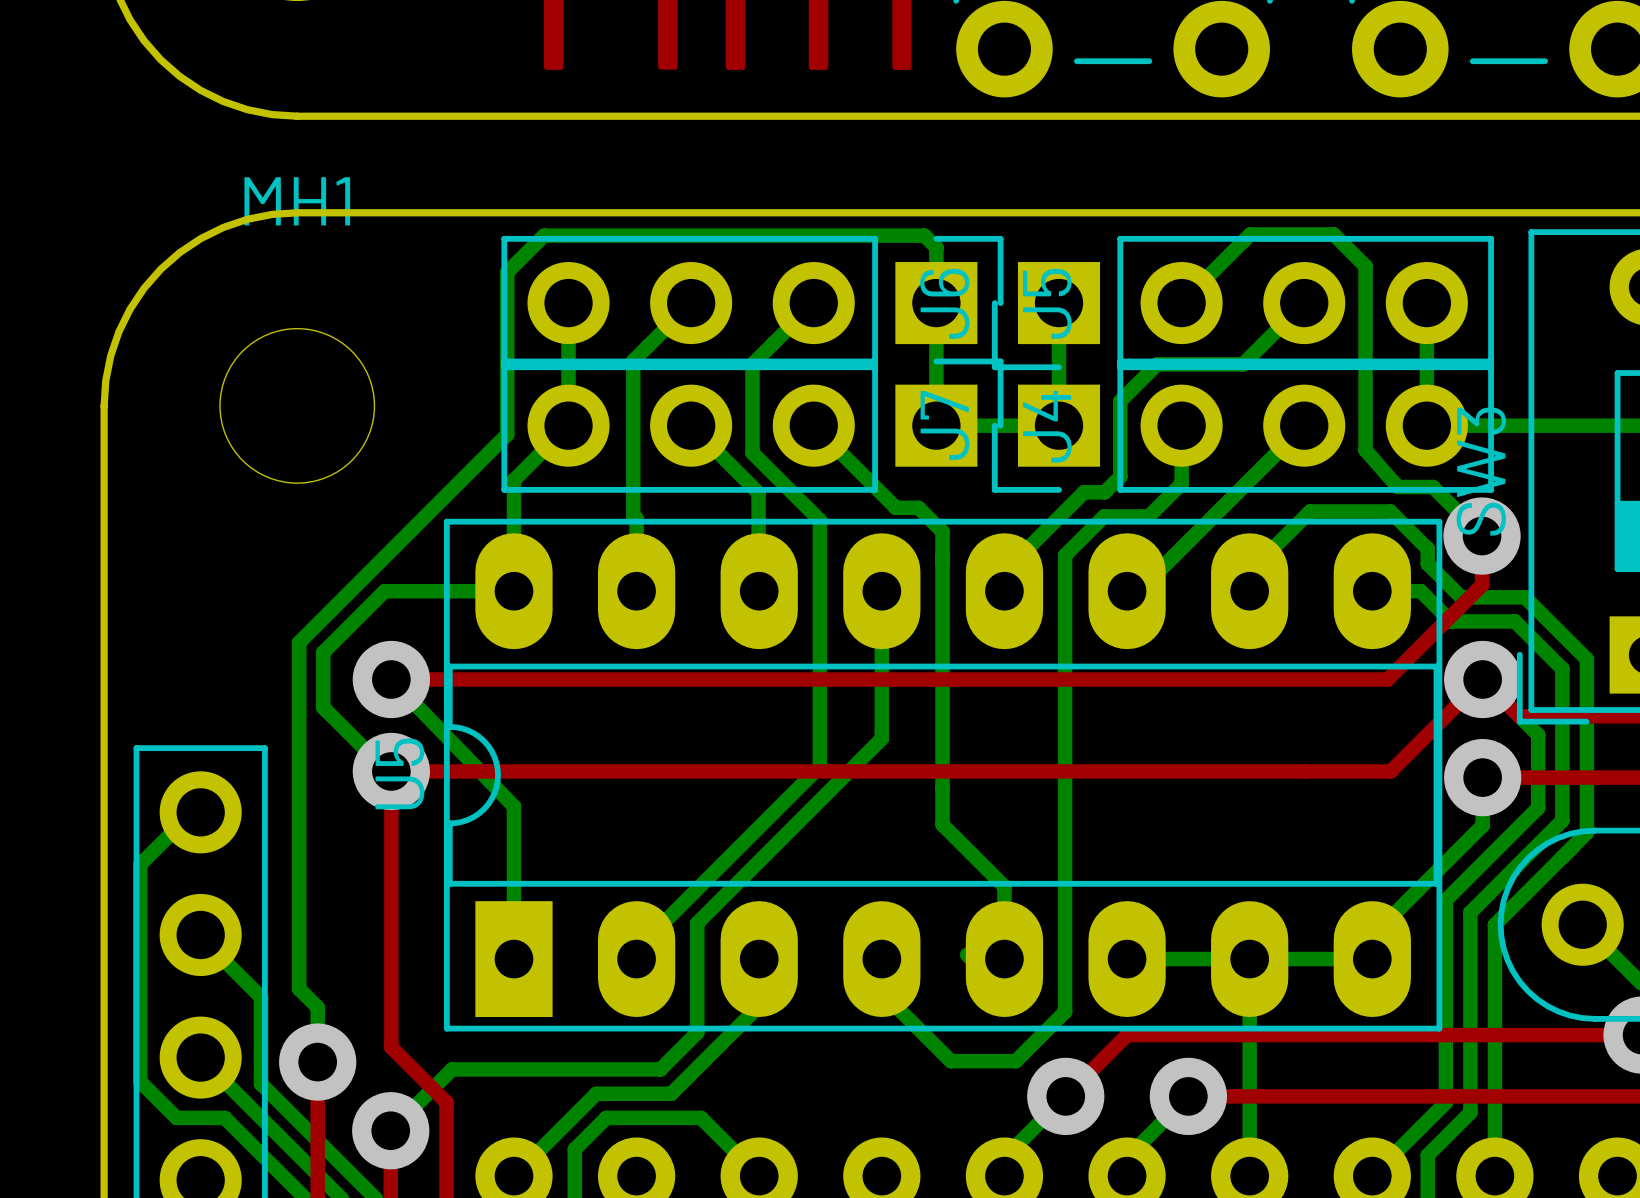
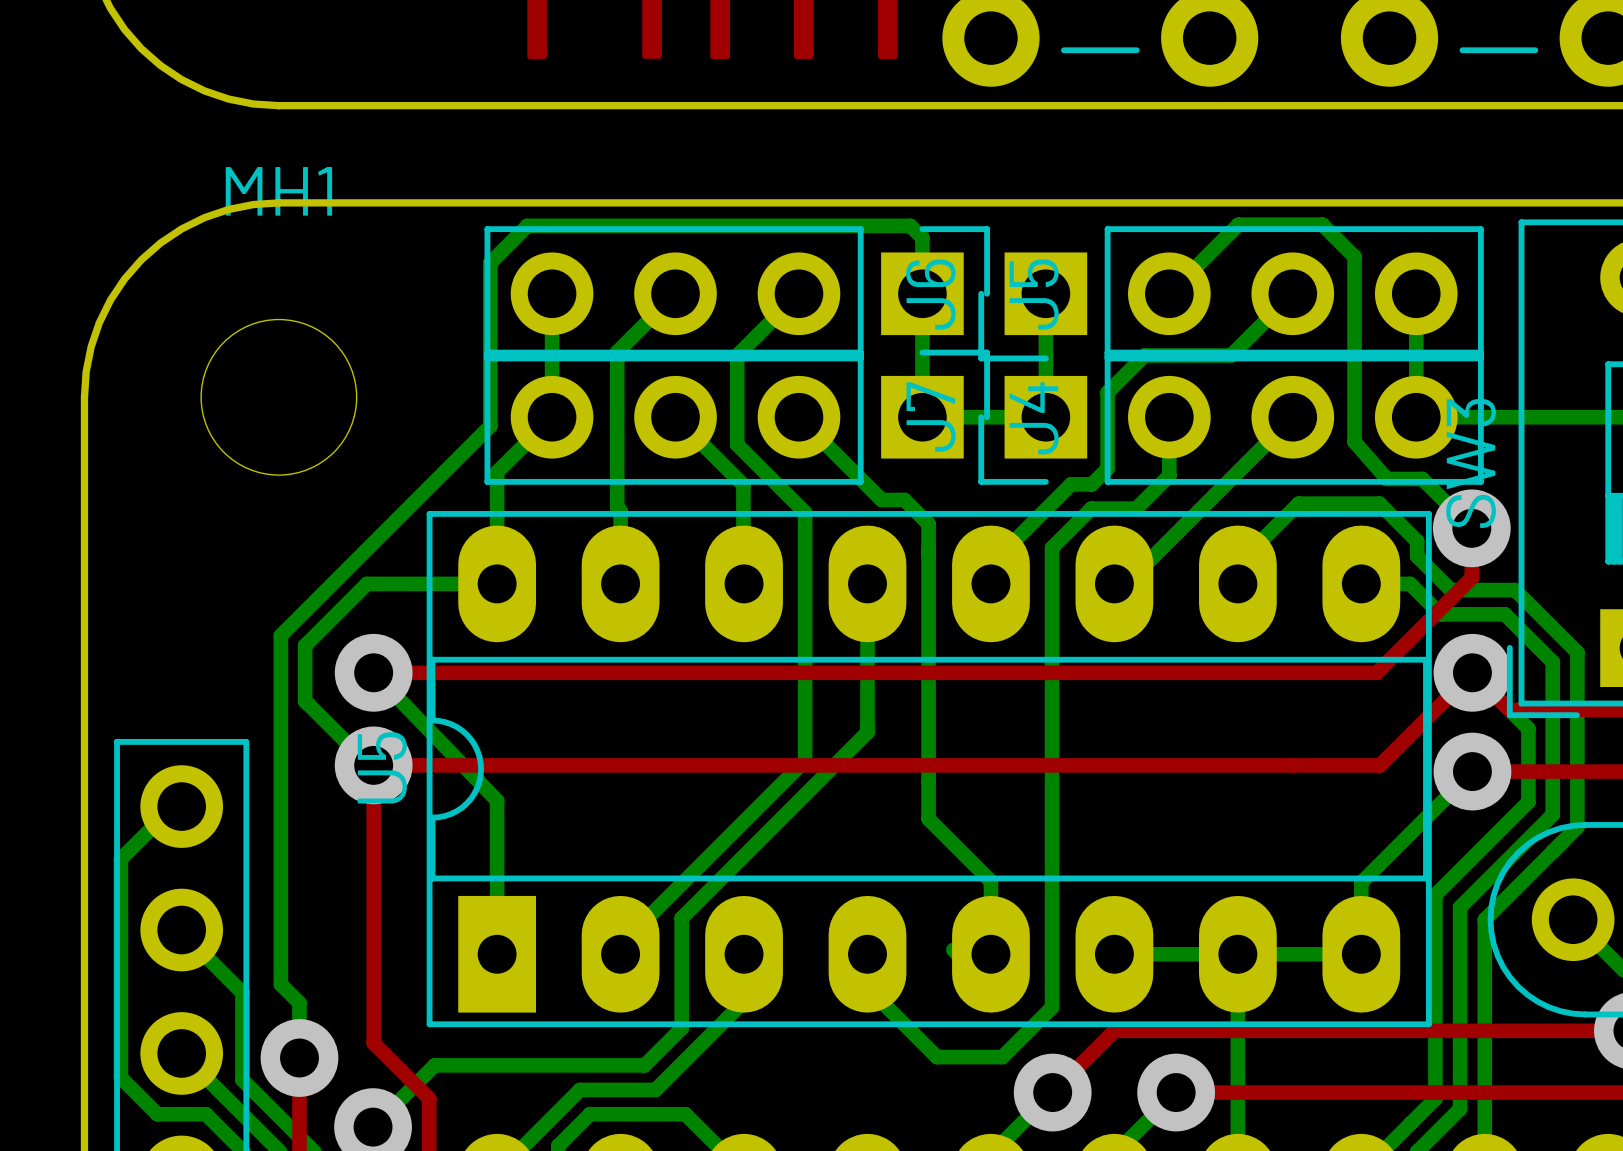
bottom track: (1482, 777) (1482, 825) (1372, 935) -> (1472, 771) (1361, 882) (1361, 930)

